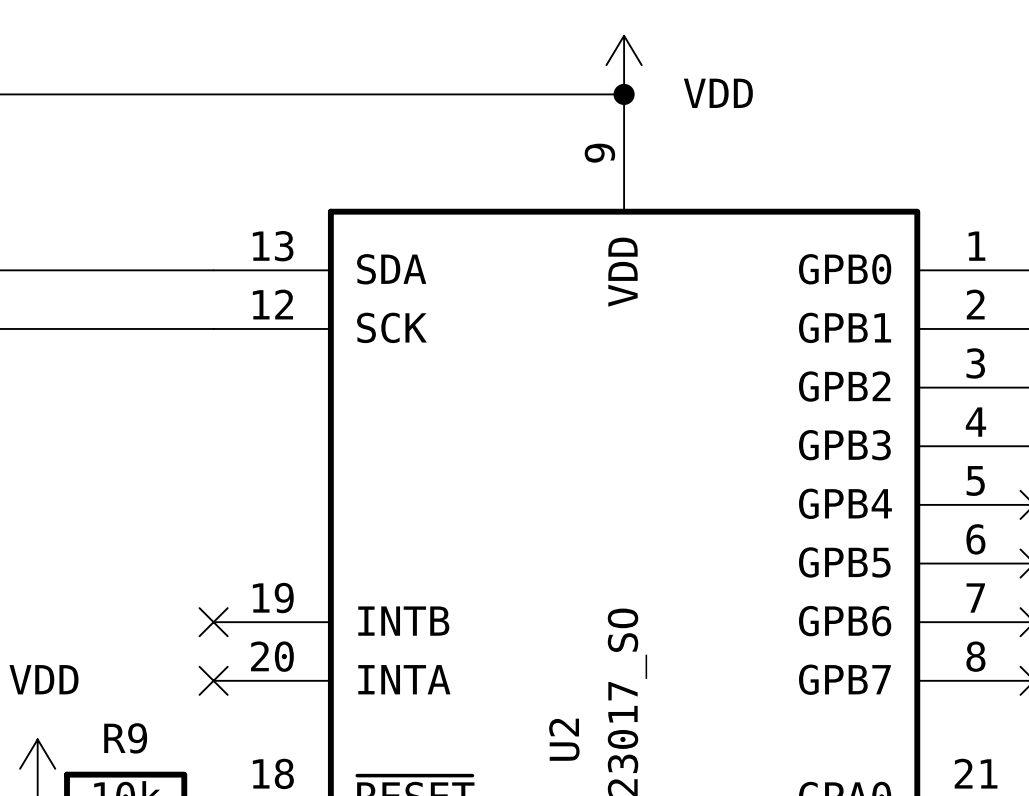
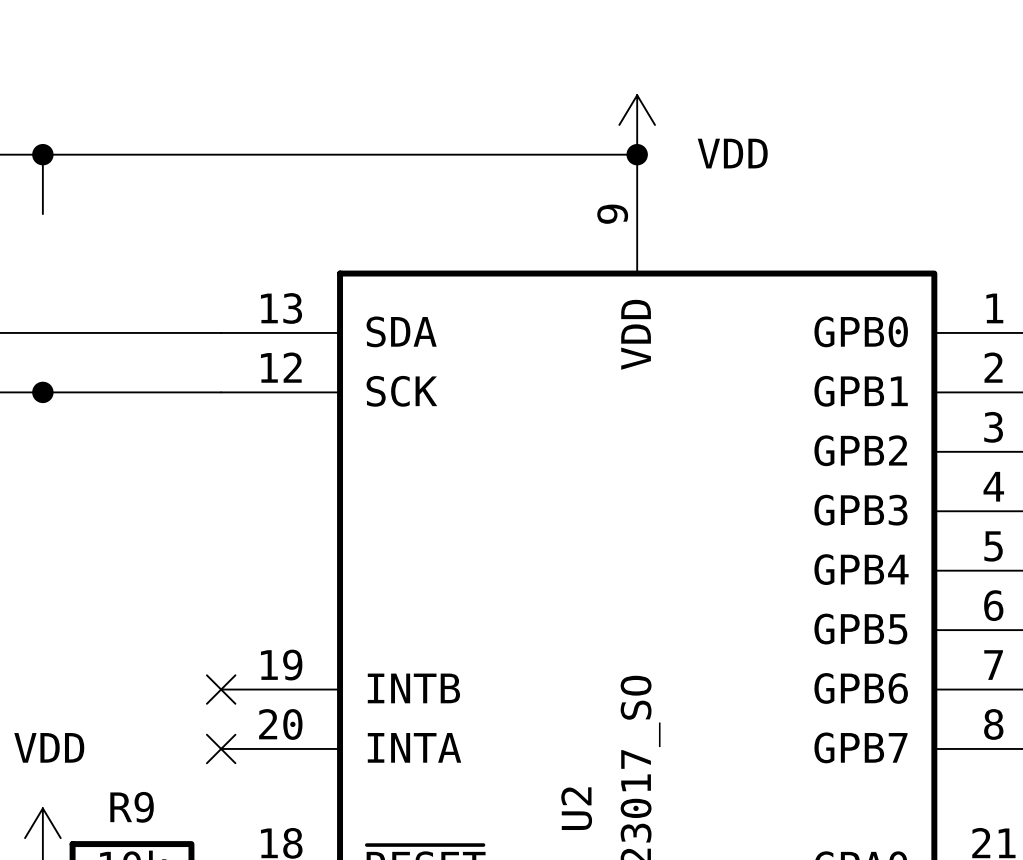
wire: none -> (42, 154) (42, 214)
junction: none -> (42, 154)
junction: none -> (42, 392)

